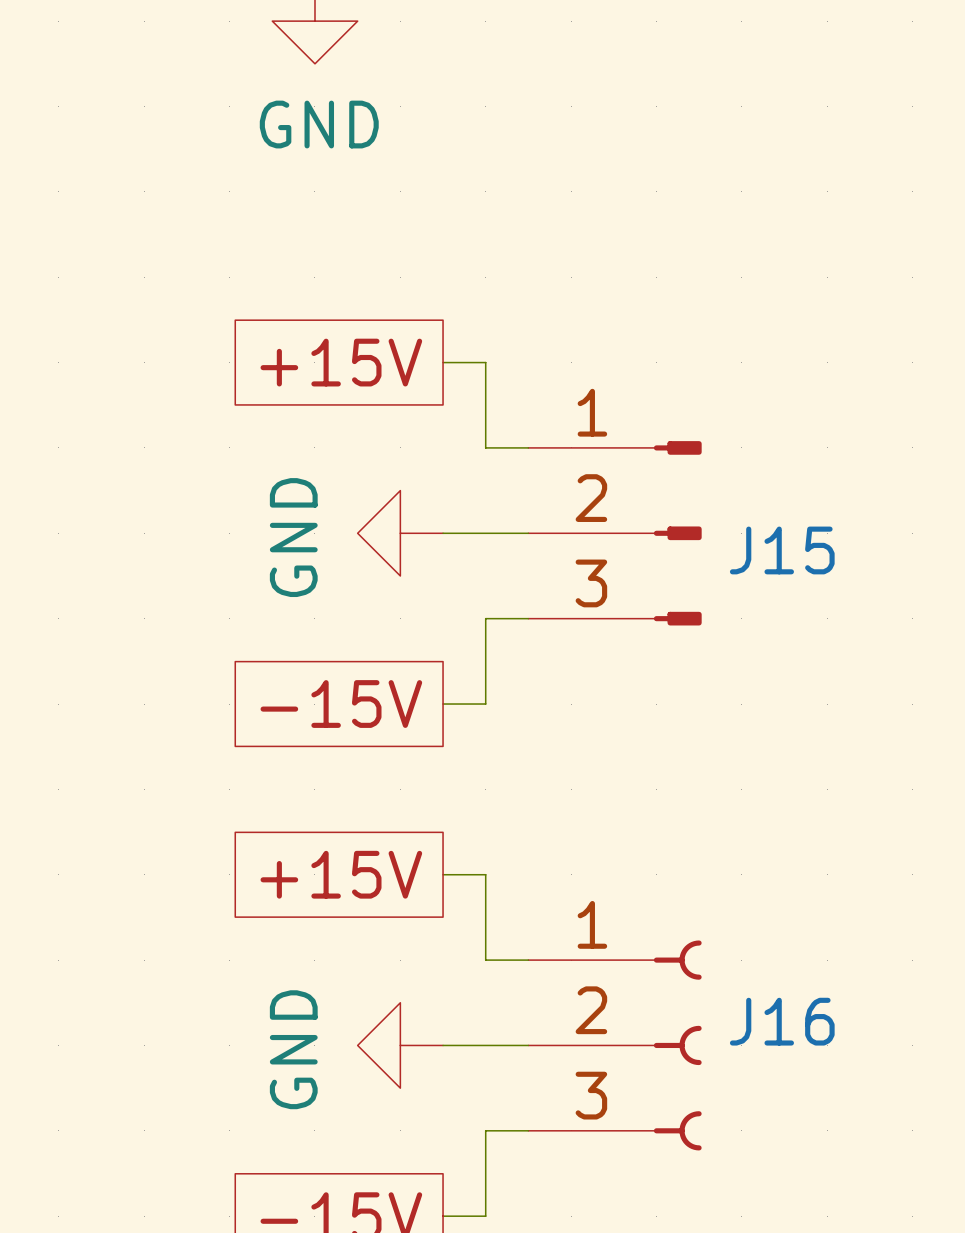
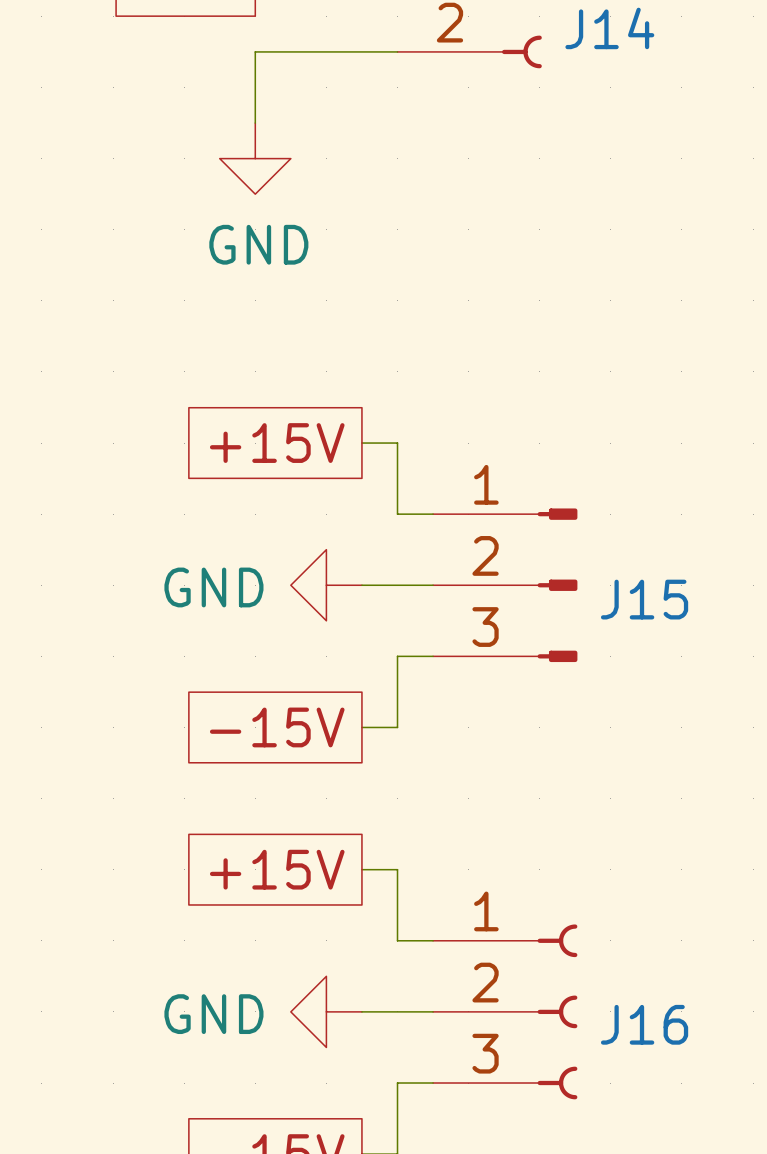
power symbol text rotation: 0° (293, 537) -> 90° clockwise (213, 587)
J16 name position: J16 (782, 1021) -> J16 (644, 1024)
power symbol text rotation: 0° (293, 1049) -> 90° clockwise (213, 1014)

